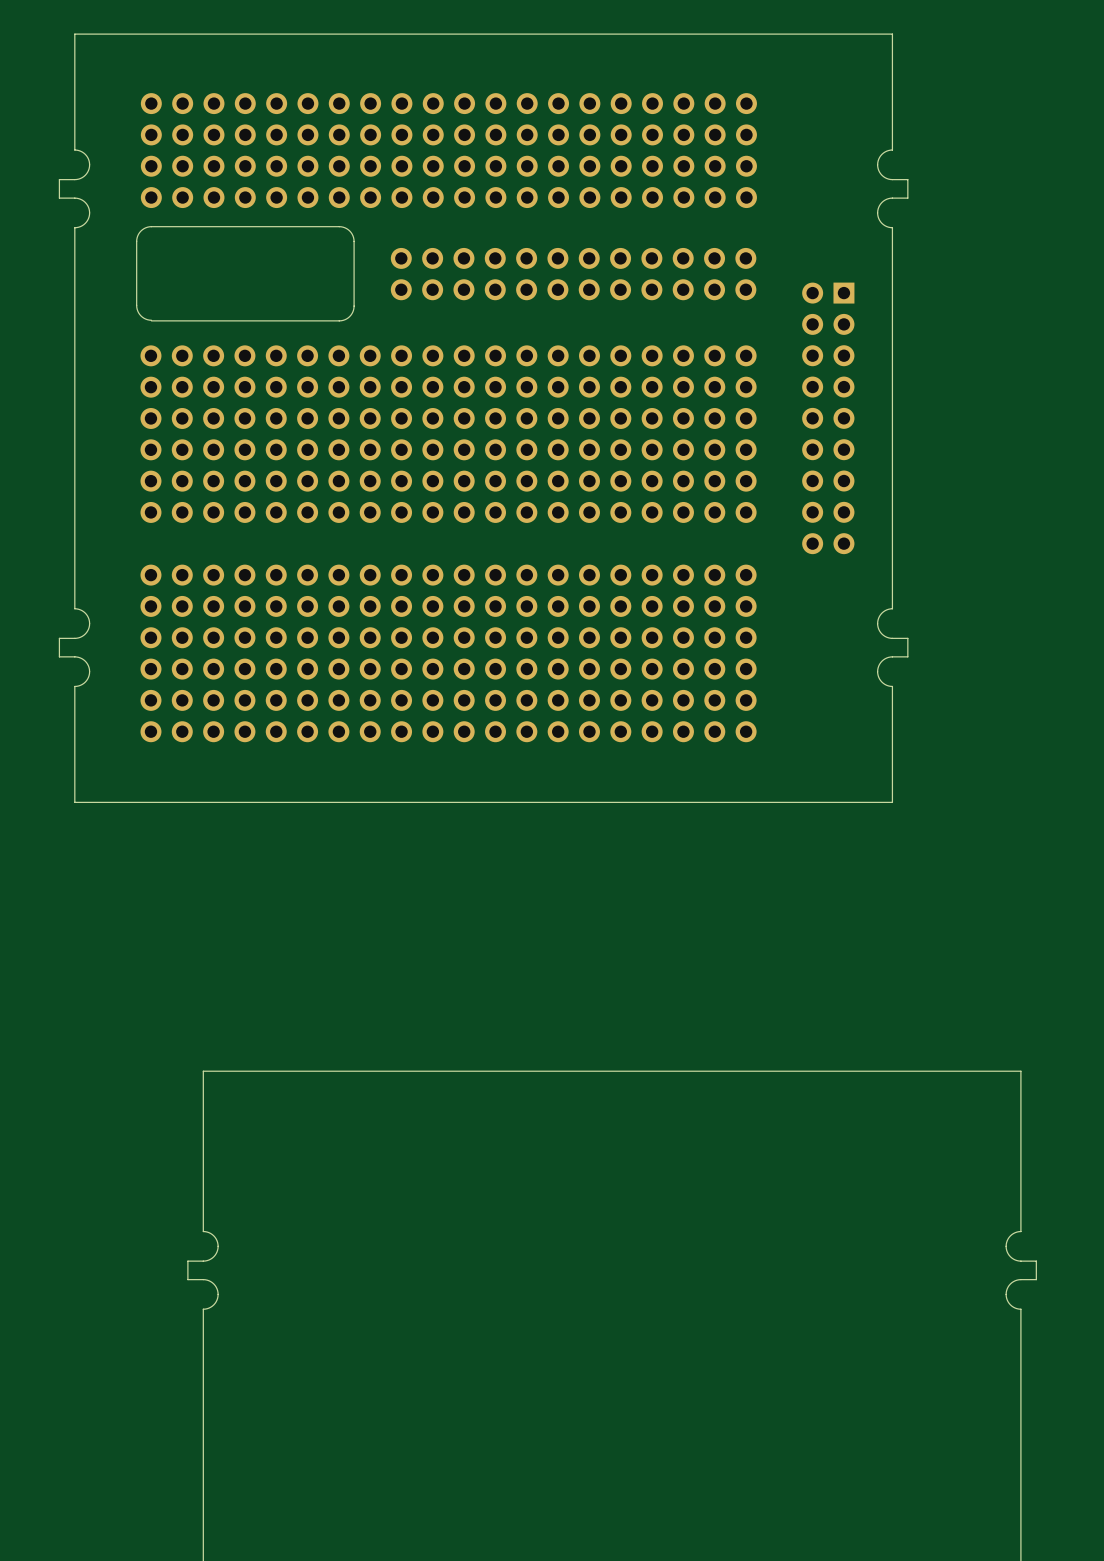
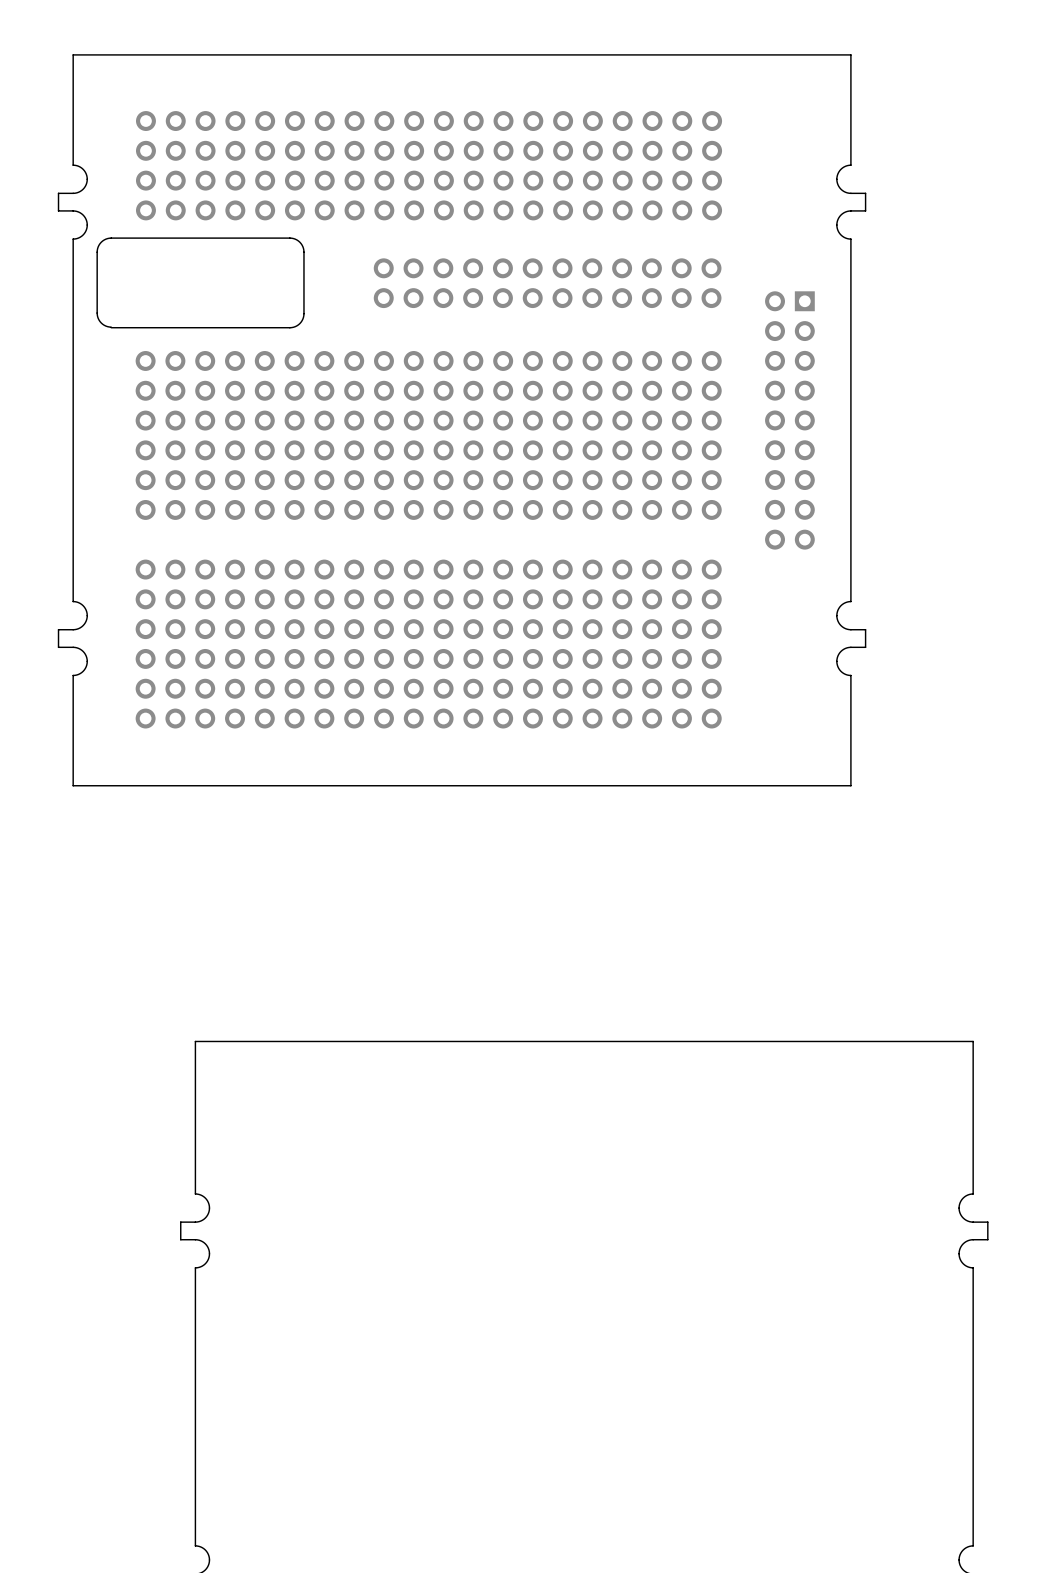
board edge: (151, 226) (141, 231) (136, 241) (136, 307) (141, 315) (151, 320) -> (146, 238) (109, 238) (102, 241) (98, 246) (97, 314) (101, 323) (111, 327)
board edge: (302, 226) (343, 227) (351, 232) (354, 241) (354, 306) (352, 313) (341, 320) (302, 320) -> (289, 238) (299, 242) (303, 252) (303, 315) (299, 323) (289, 327)
board edge: none -> (146, 327) (111, 327)

